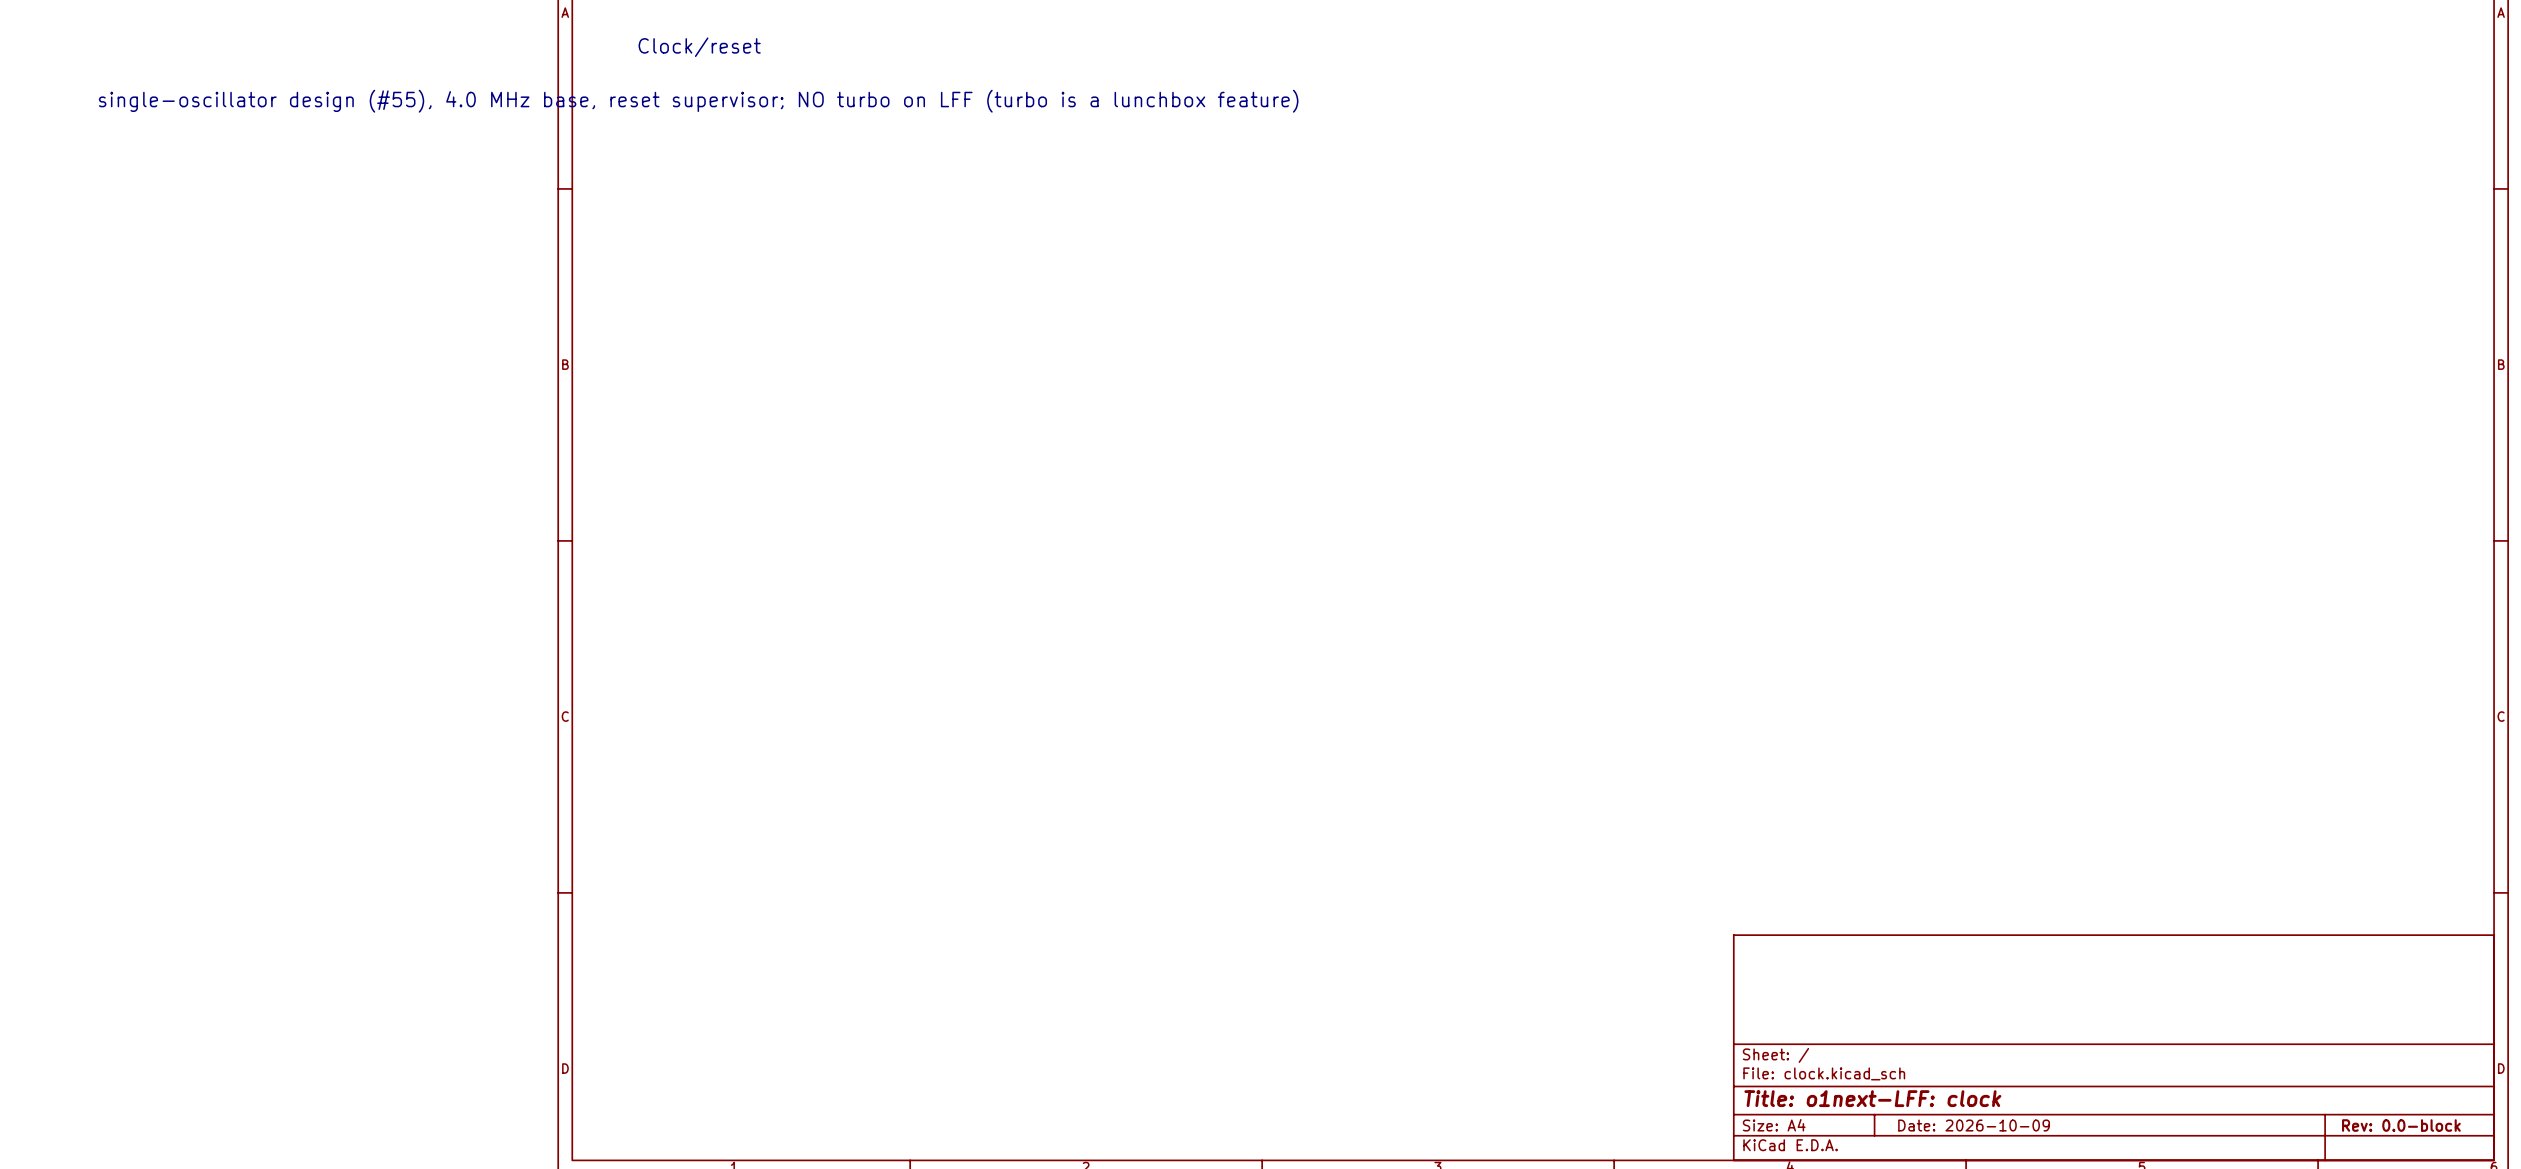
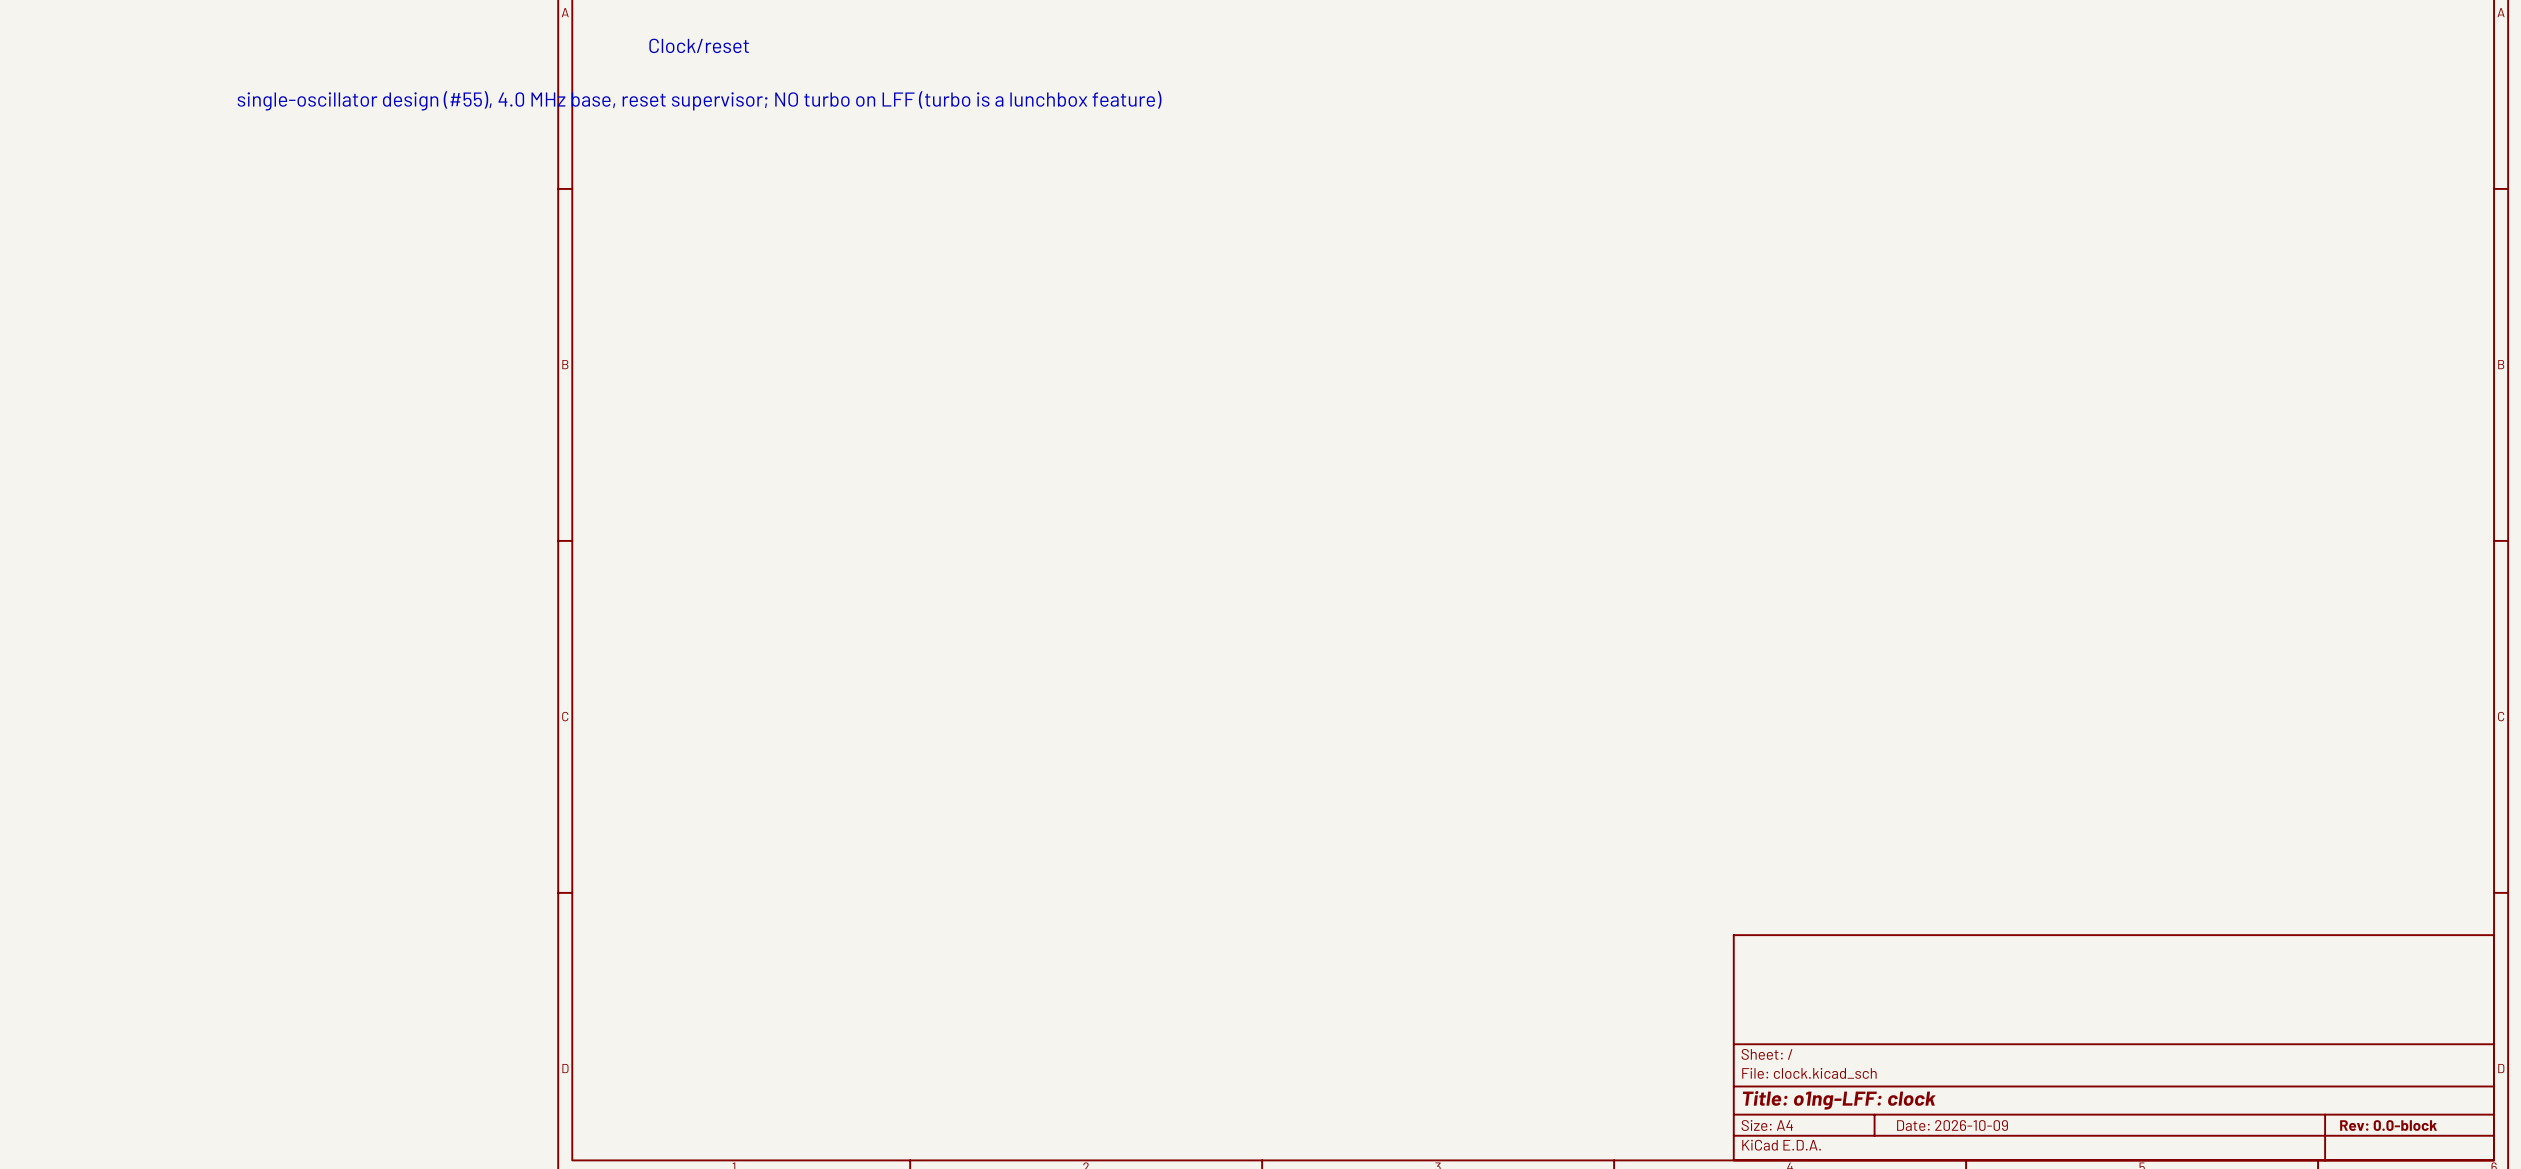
title block: Title: o1next-LFF: clock (1872, 1098) -> Title: o1ng-LFF: clock (1839, 1100)

